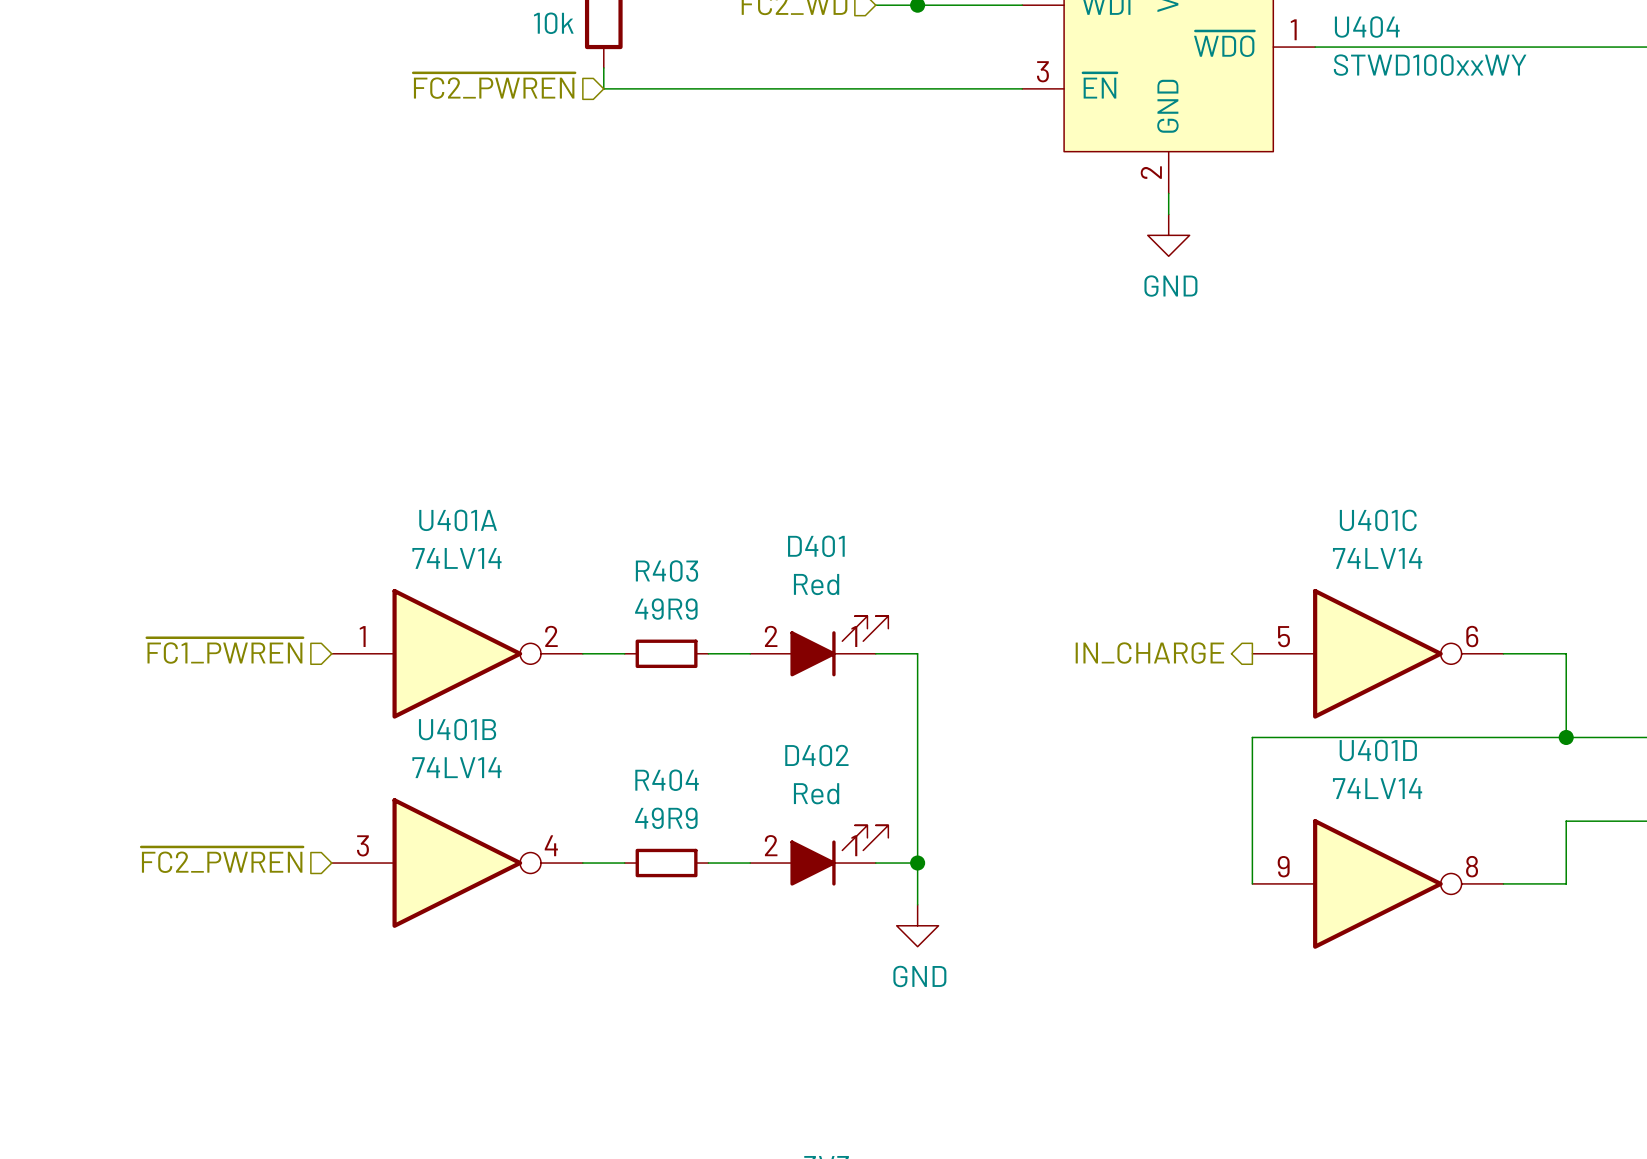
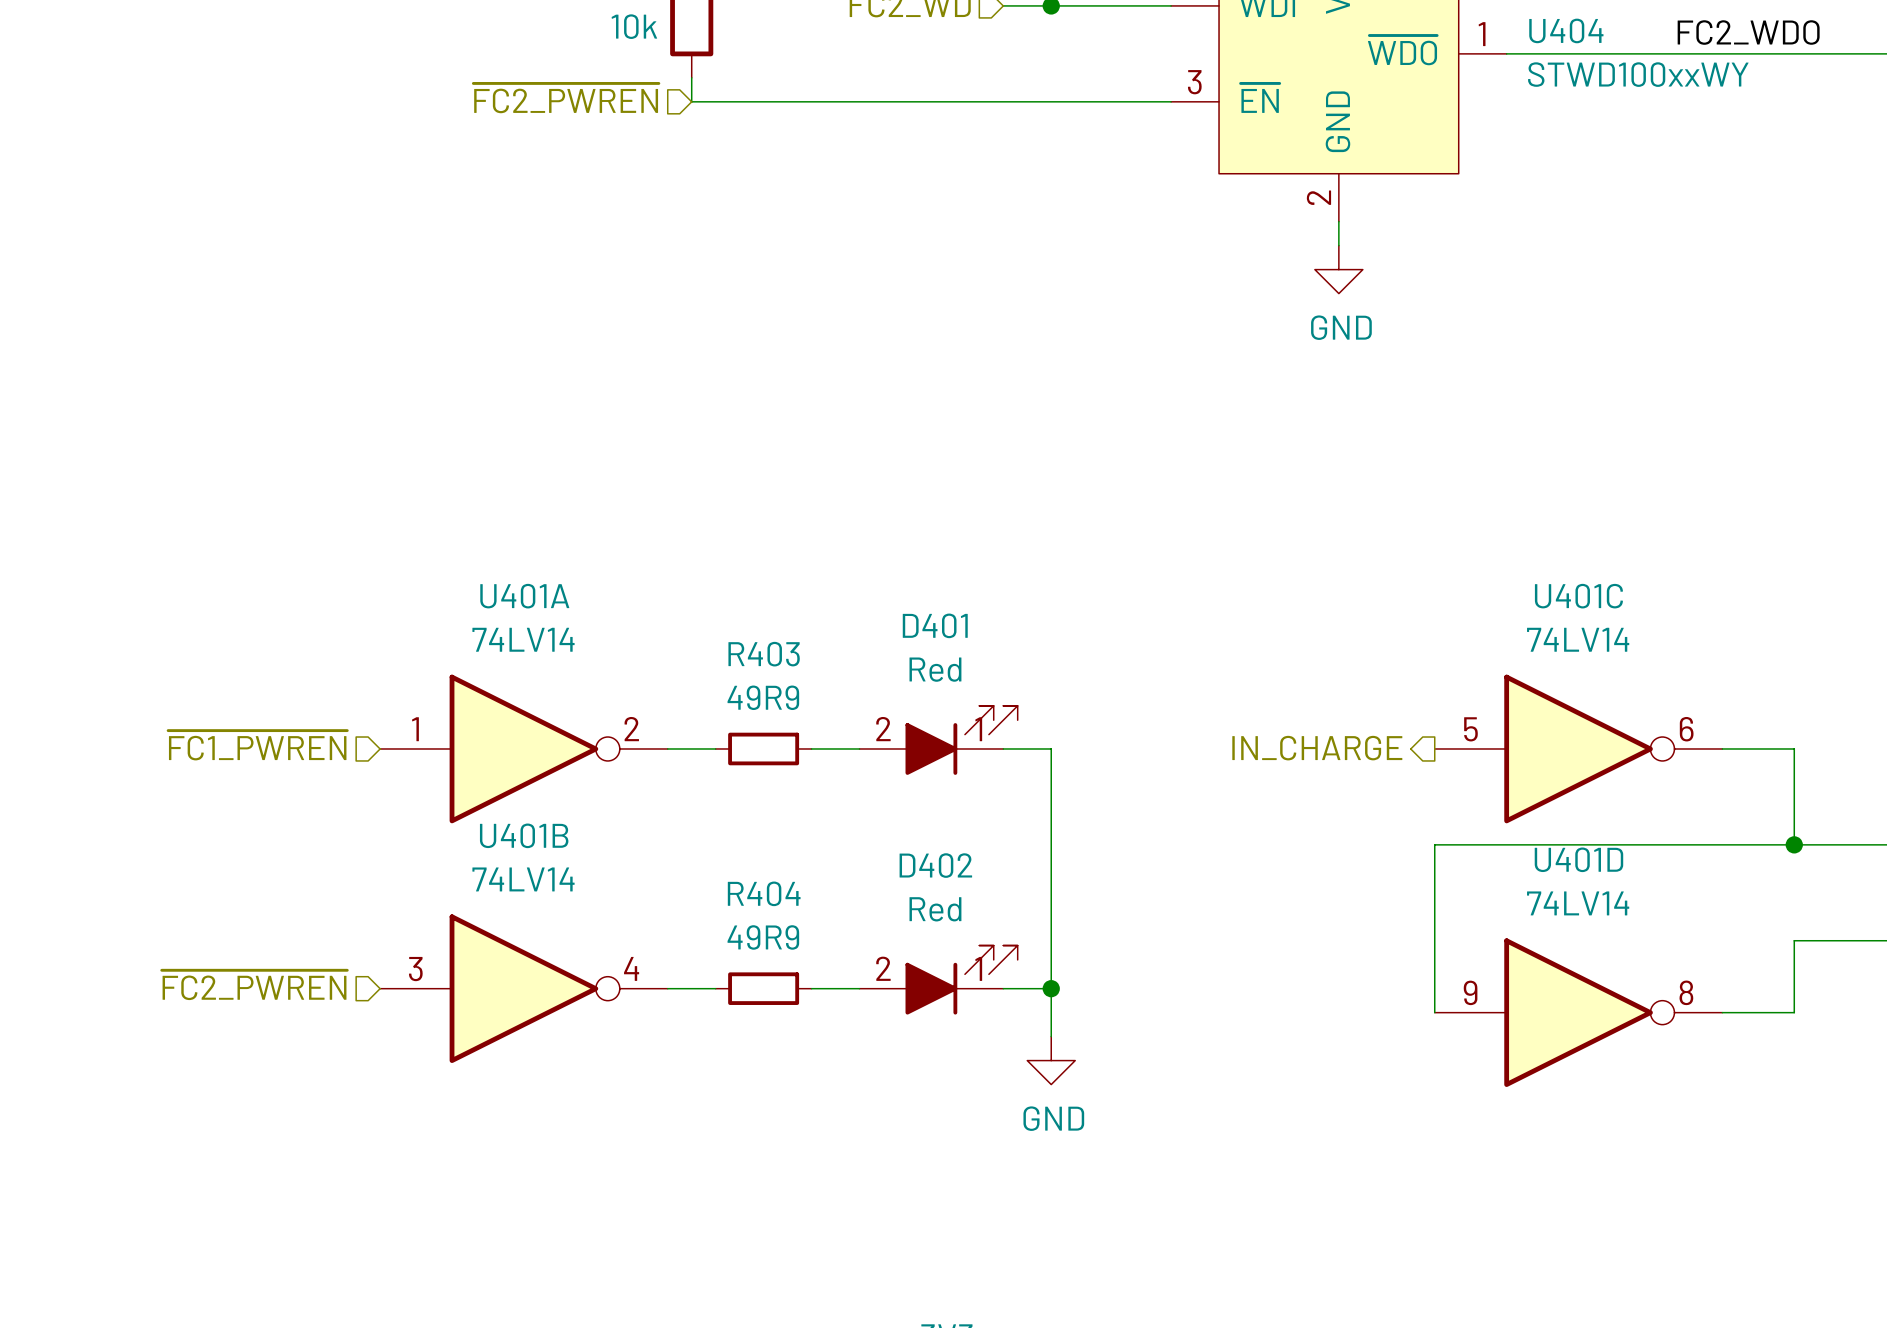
label: none -> FC2_WDO (1748, 32)

